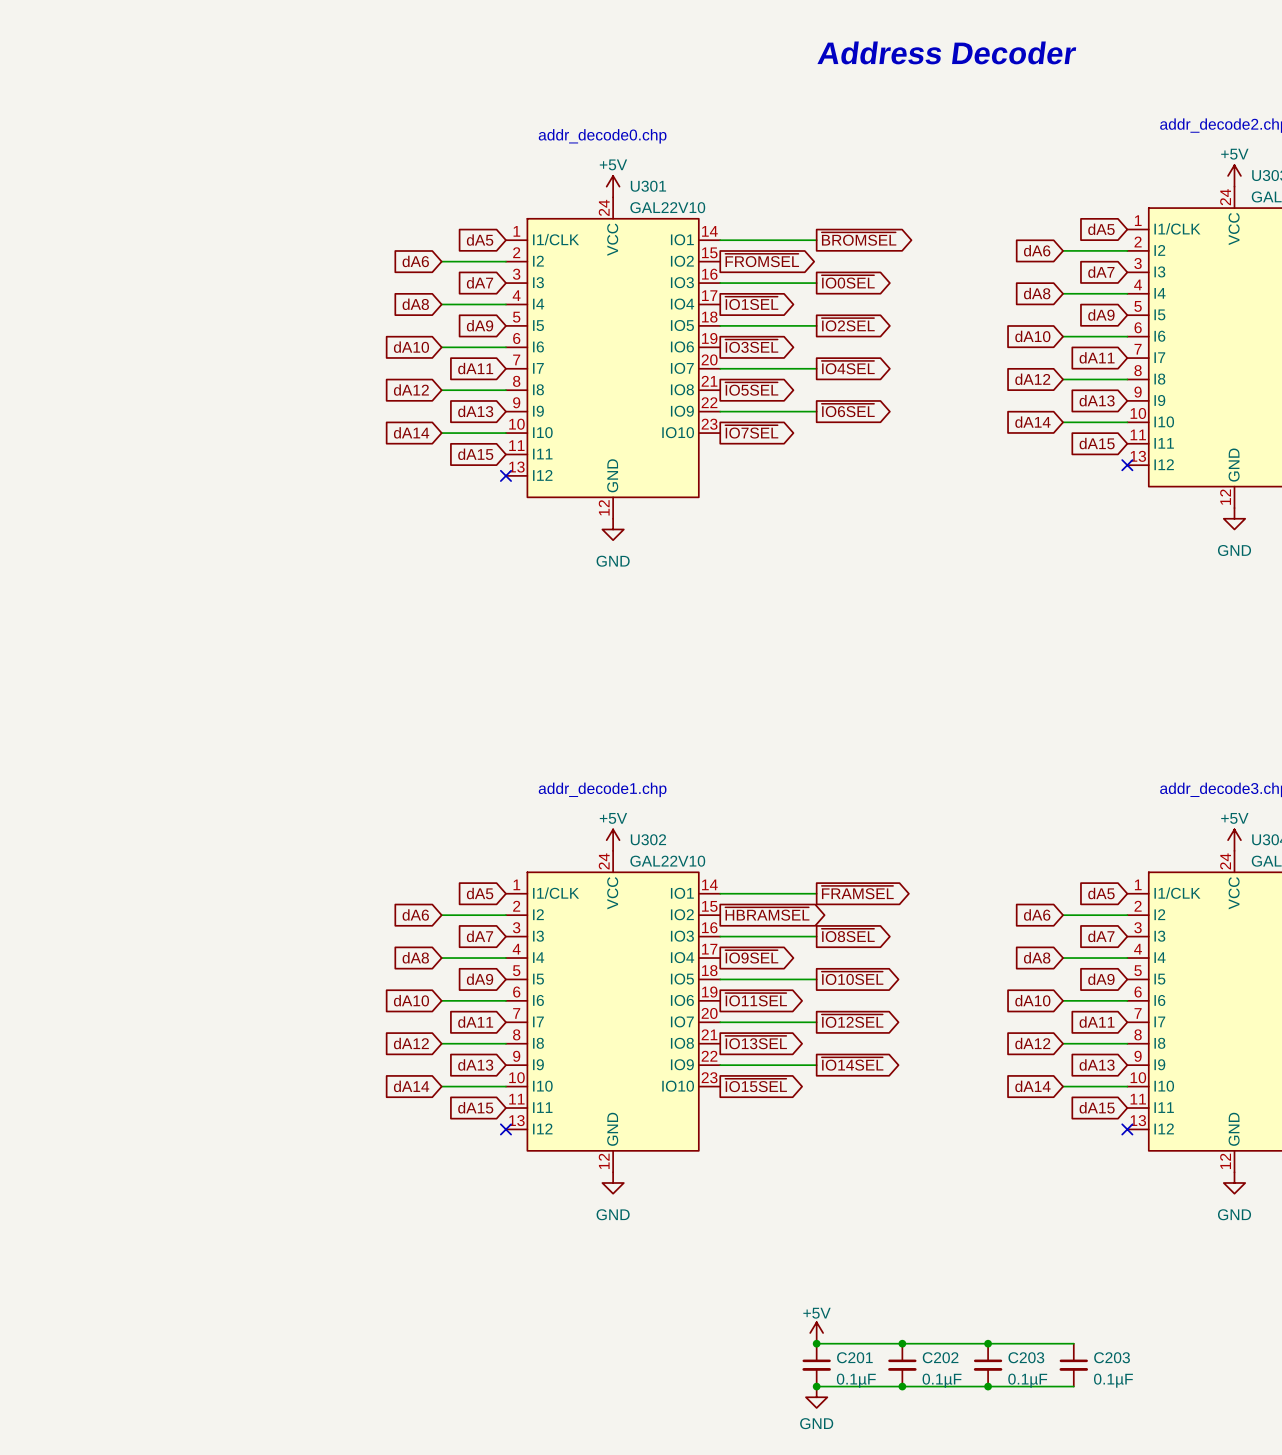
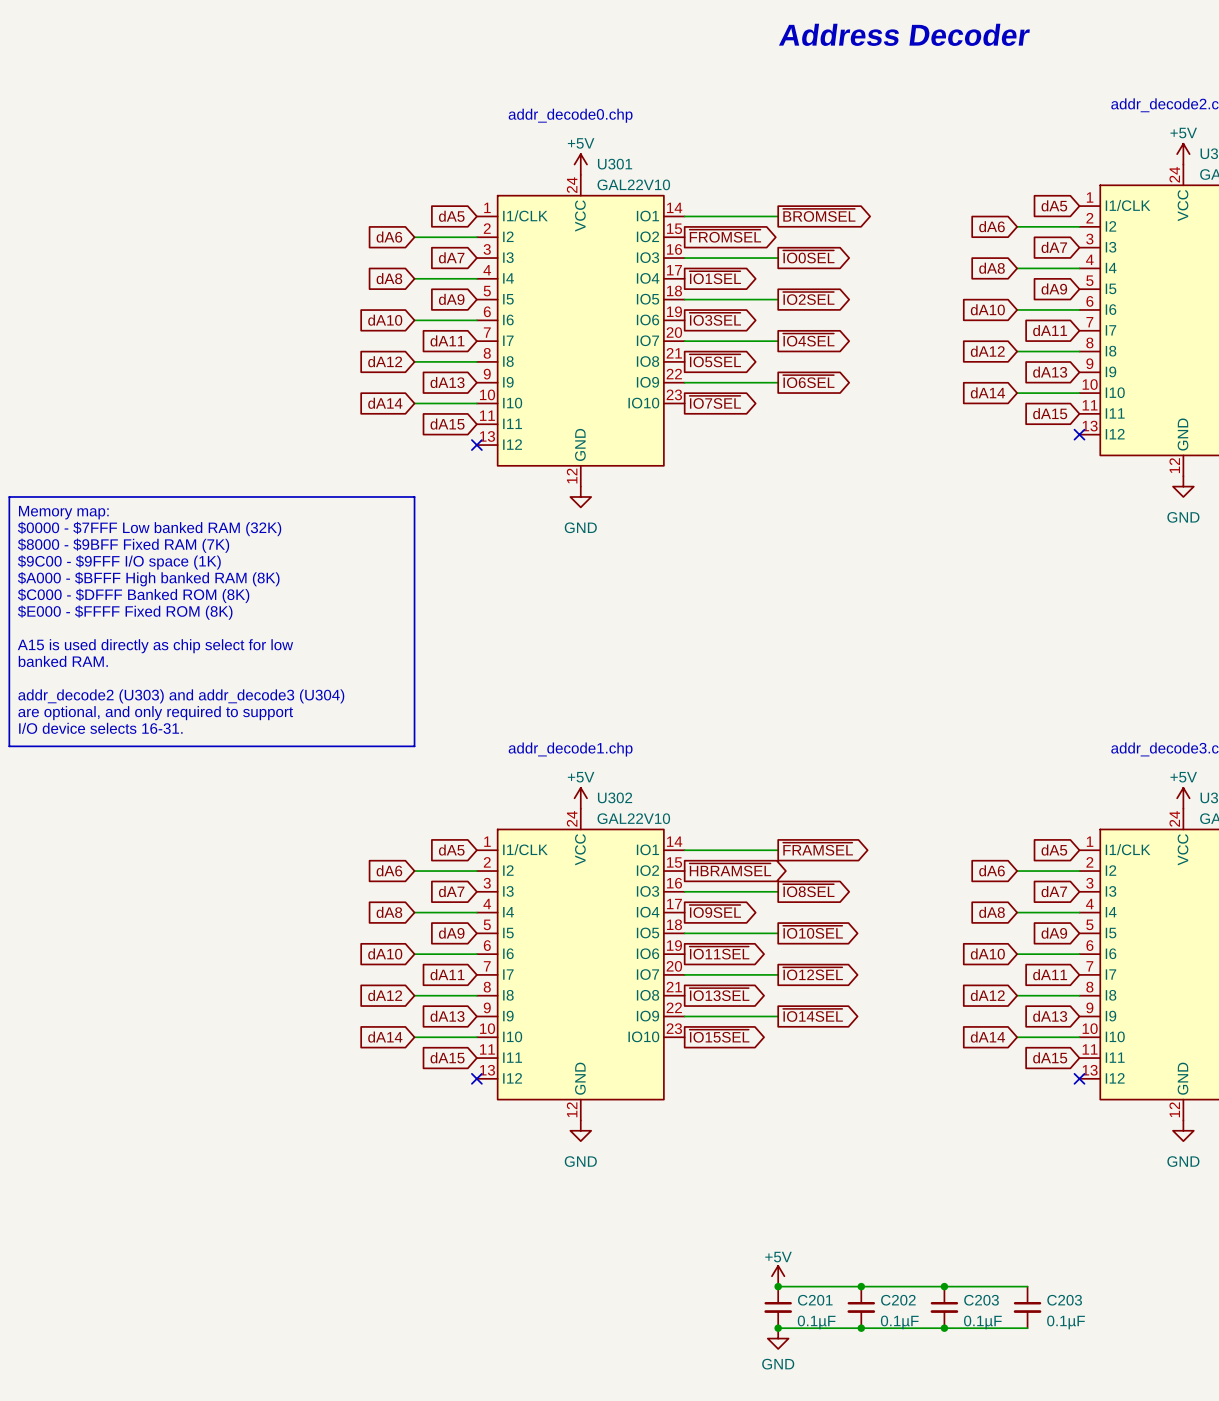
line: none -> (9, 496) (414, 496) (414, 746) (9, 746) (9, 496)
text: none -> Memory map: (63, 512)
text: none -> $0000 - $7FFF Low banked RAM (32K) (149, 528)
text: none -> $8000 - $9BFF Fixed RAM (7K) (123, 545)
text: none -> $9C00 - $9FFF I/O space (1K) (119, 562)
text: none -> $A000 - $BFFF High banked RAM (8K) (148, 579)
text: none -> $C000 - $DFFF Banked ROM (8K) (133, 595)
text: none -> $E000 - $FFFF Fixed ROM (8K) (125, 612)
text: none -> A15 is used directly as chip select for low (155, 646)
text: none -> banked RAM. (63, 661)
text: none -> addr_decode2 (U303) and addr_decode3 (U304) (181, 696)
text: none -> are optional, and only required to support (155, 713)
text: none -> I/O device selects 16-31. (100, 728)

